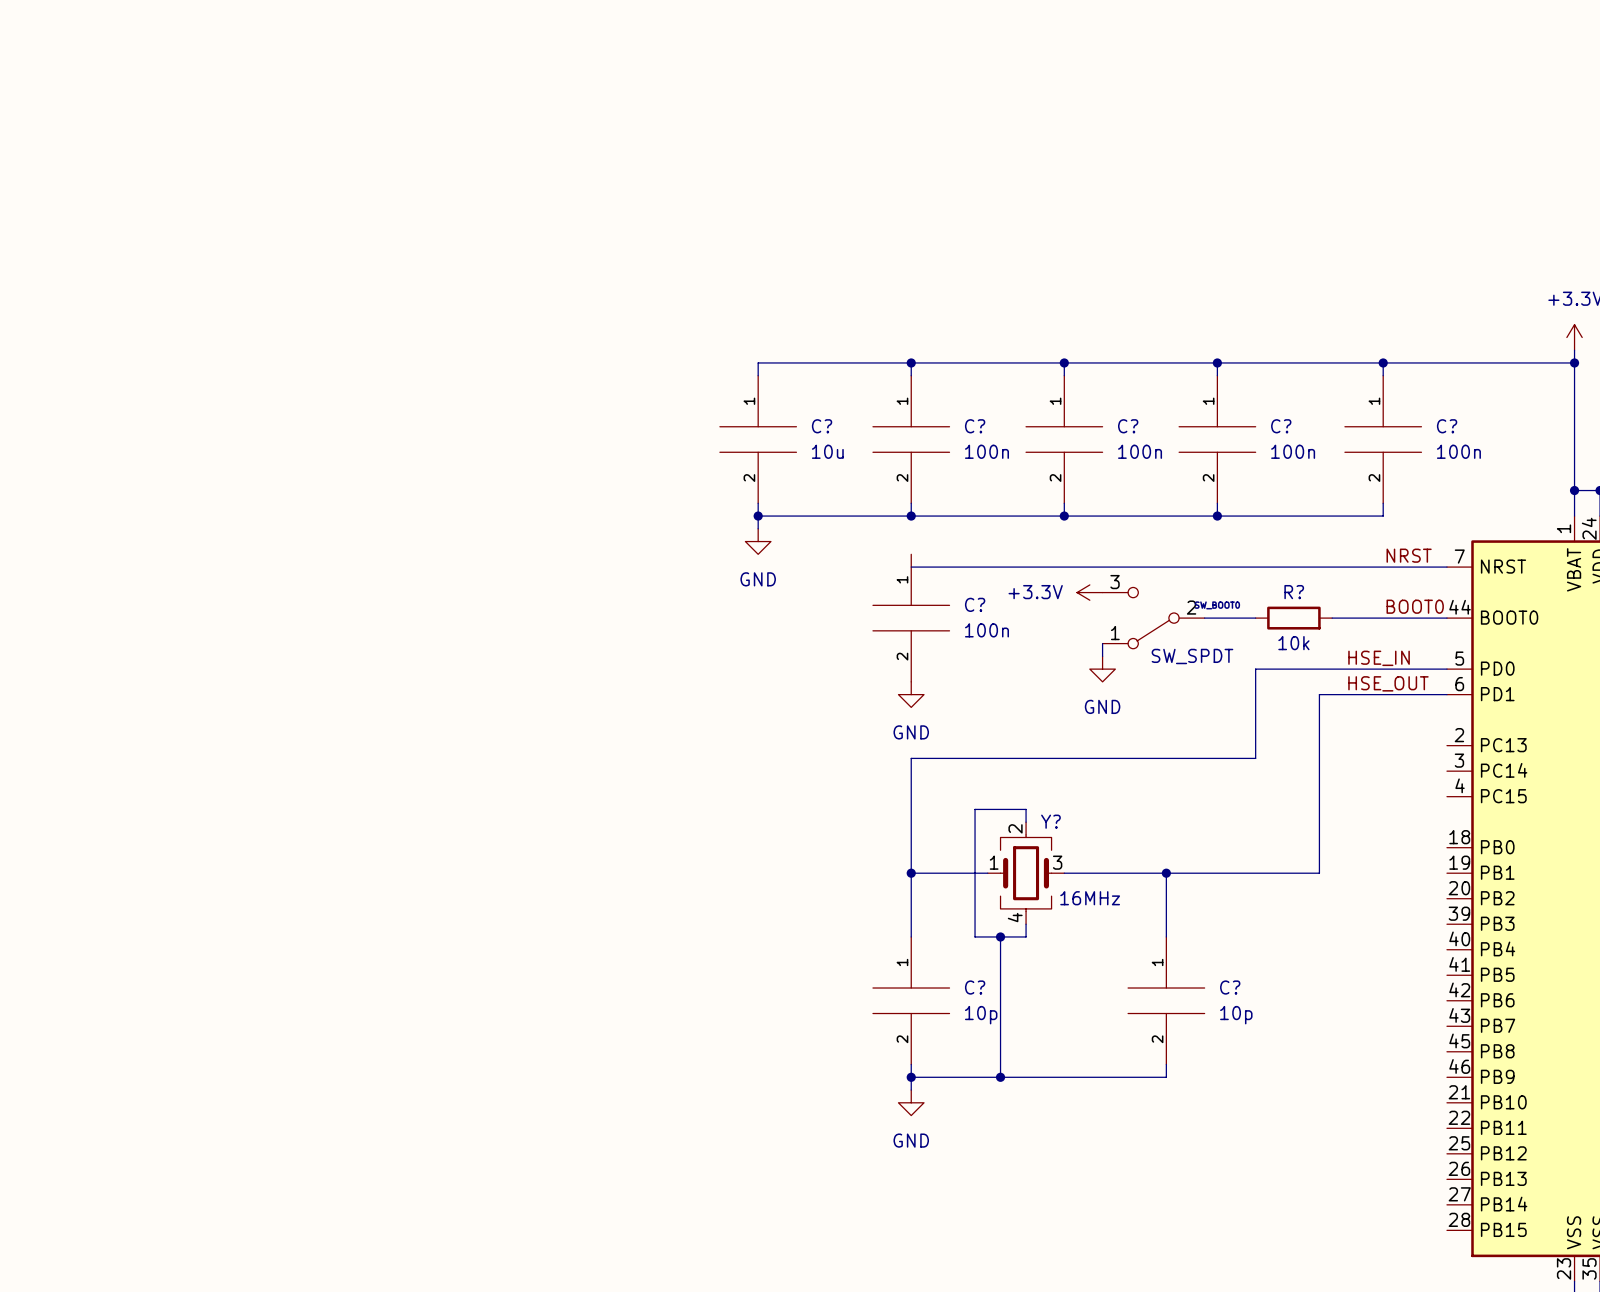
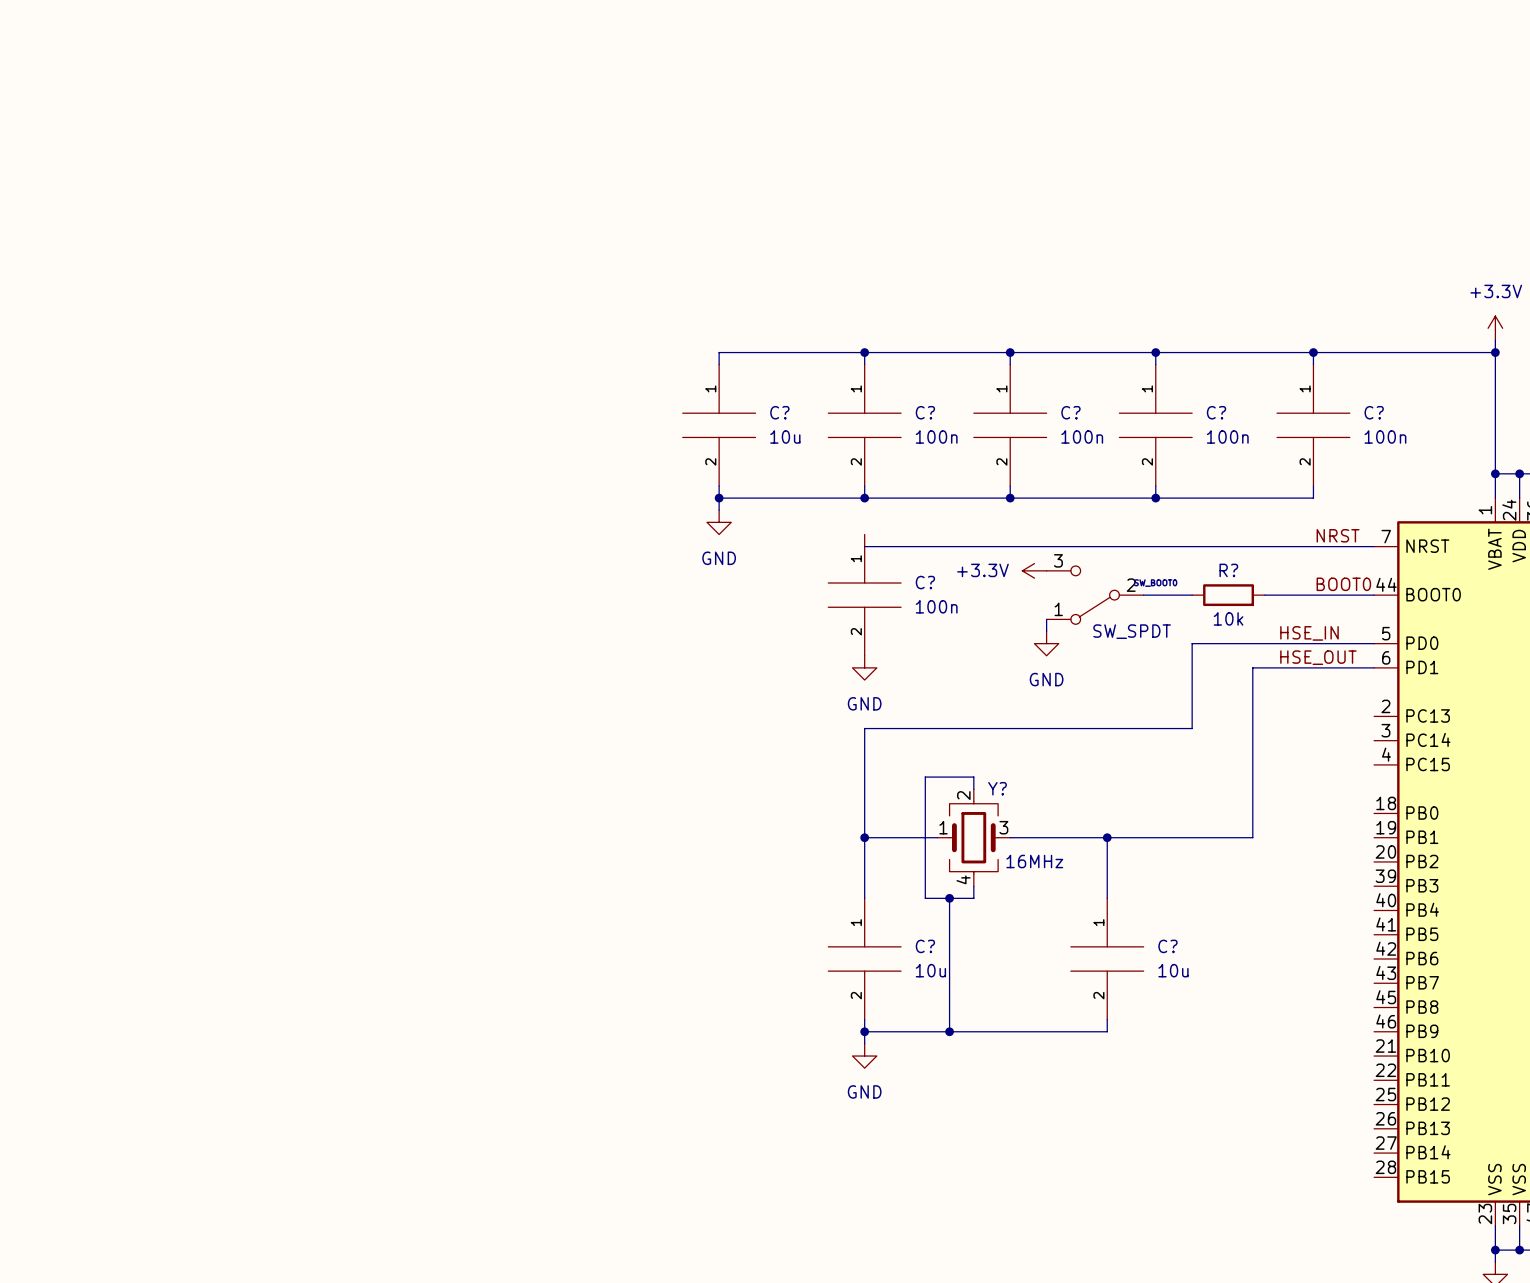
C? value: 10p (981, 1015) -> 10u (930, 970)
C? value: 10p (1236, 1015) -> 10u (1173, 970)

